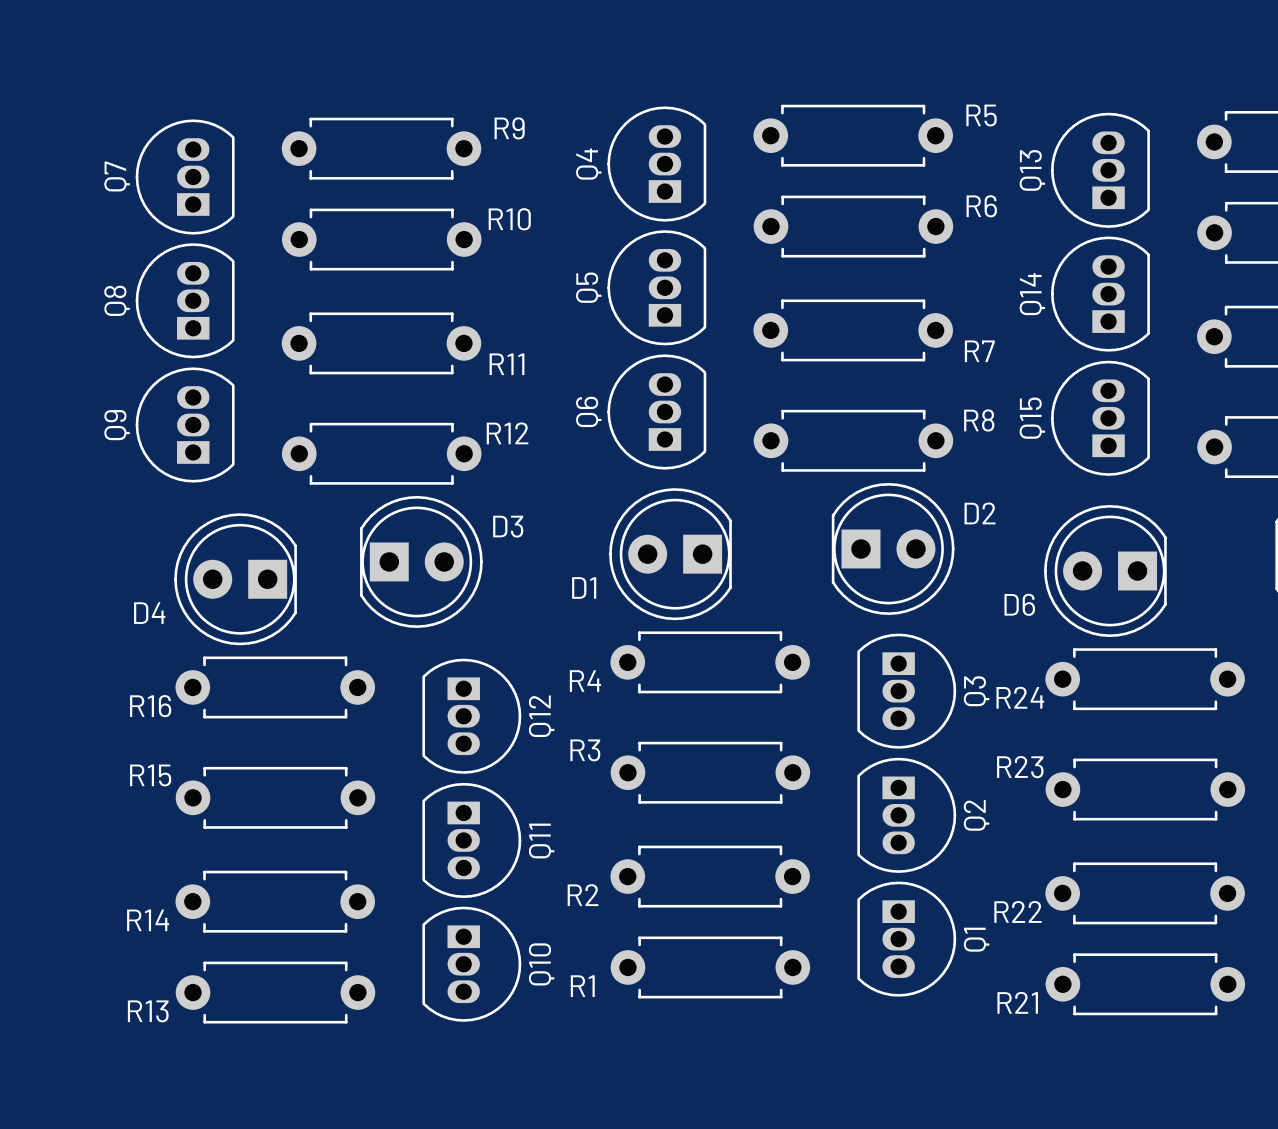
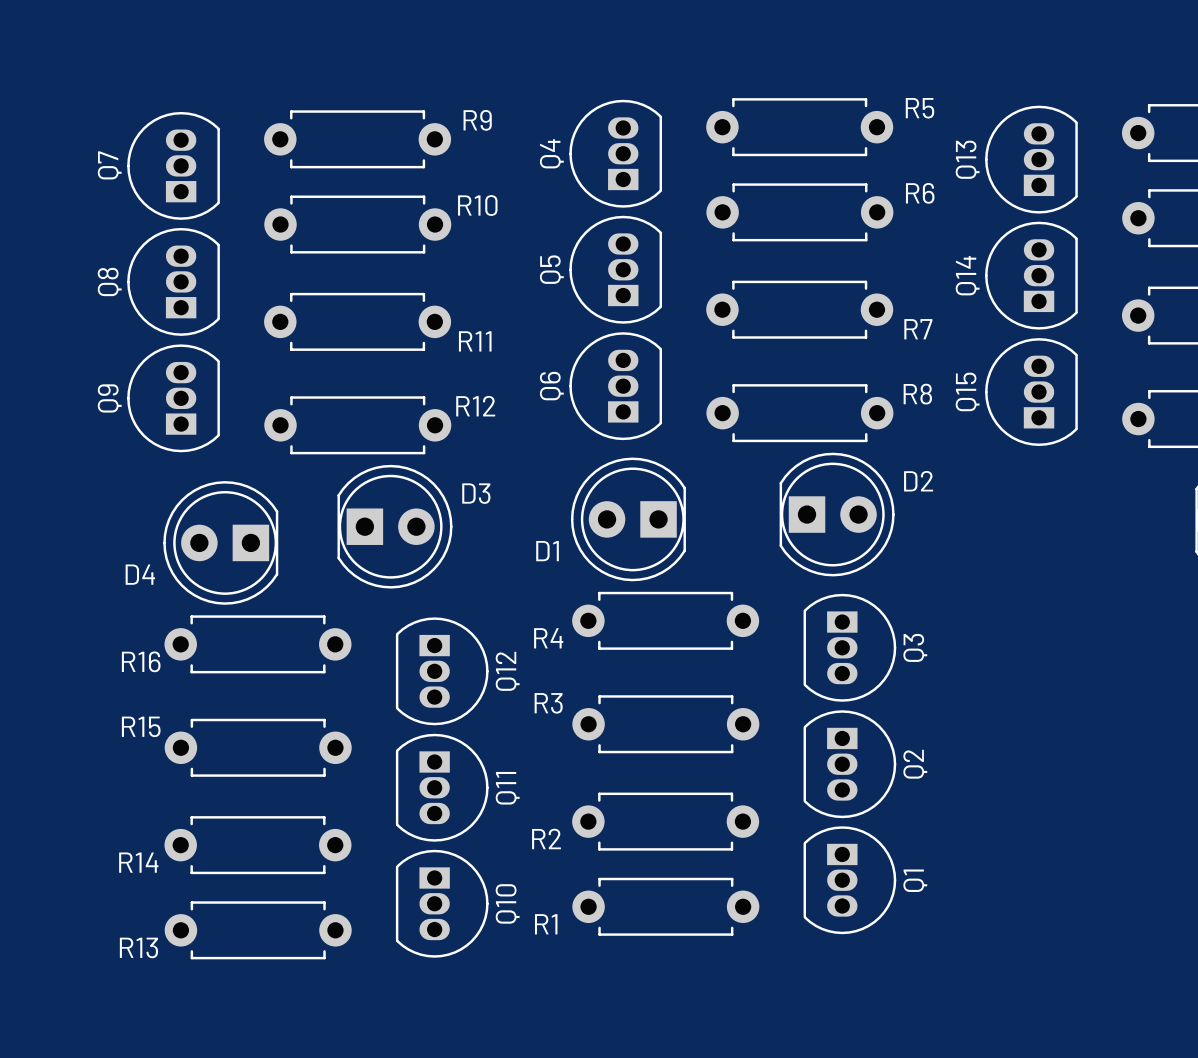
D6: (1105, 571) -> none
R24: (1145, 679) -> none
R23: (1145, 789) -> none
R22: (1145, 893) -> none
R21: (1145, 984) -> none

